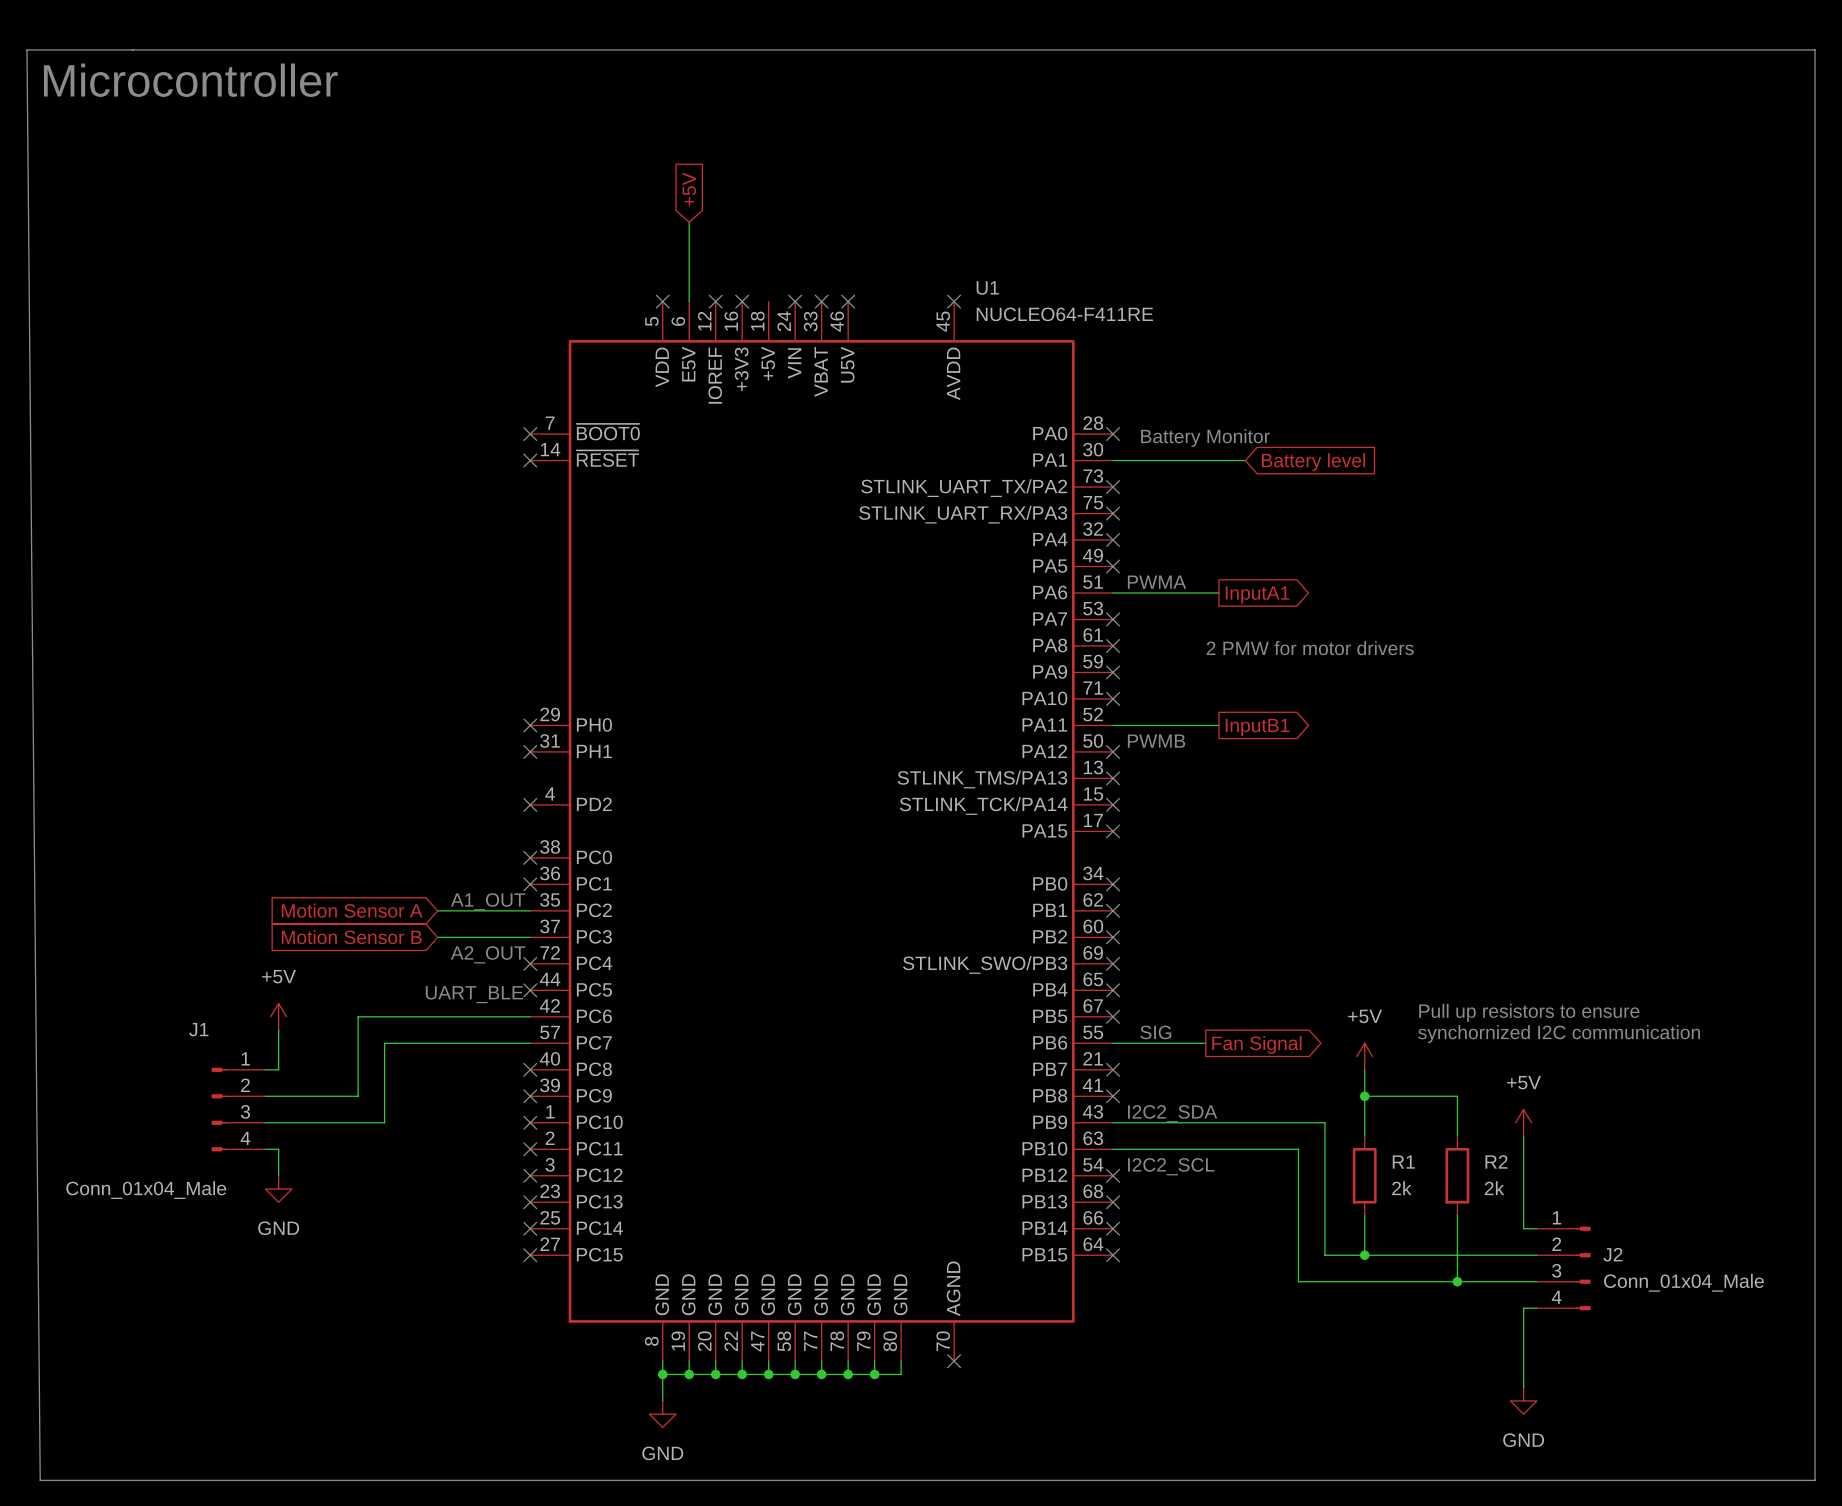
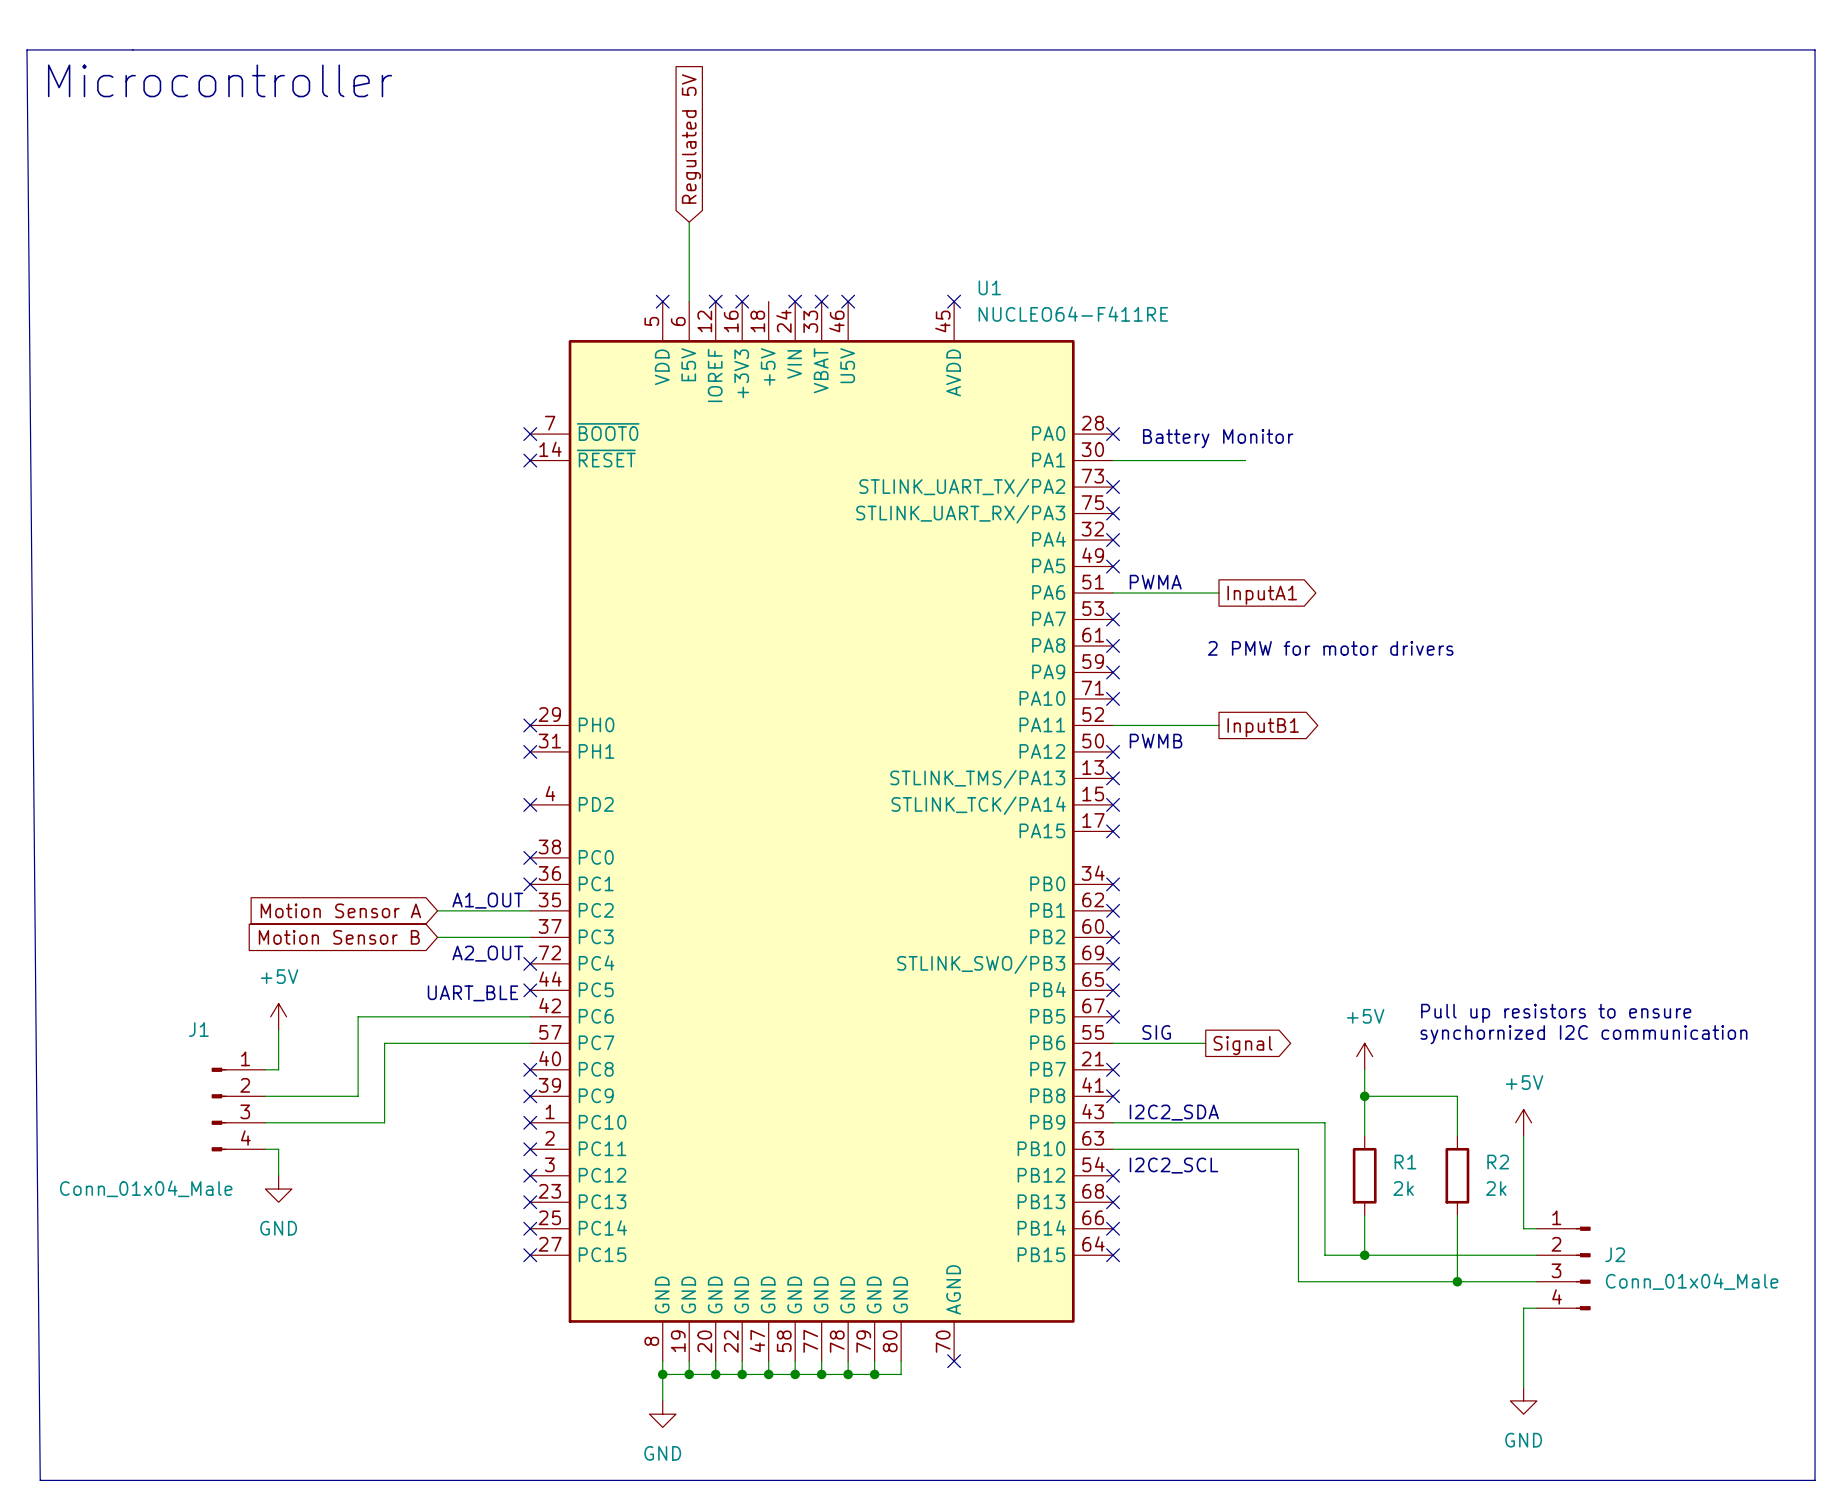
global label: +5V (689, 189) -> Regulated 5V (691, 139)
global label: Battery level (1313, 462) -> none
global label: Fan Signal (1256, 1044) -> Signal (1242, 1045)

